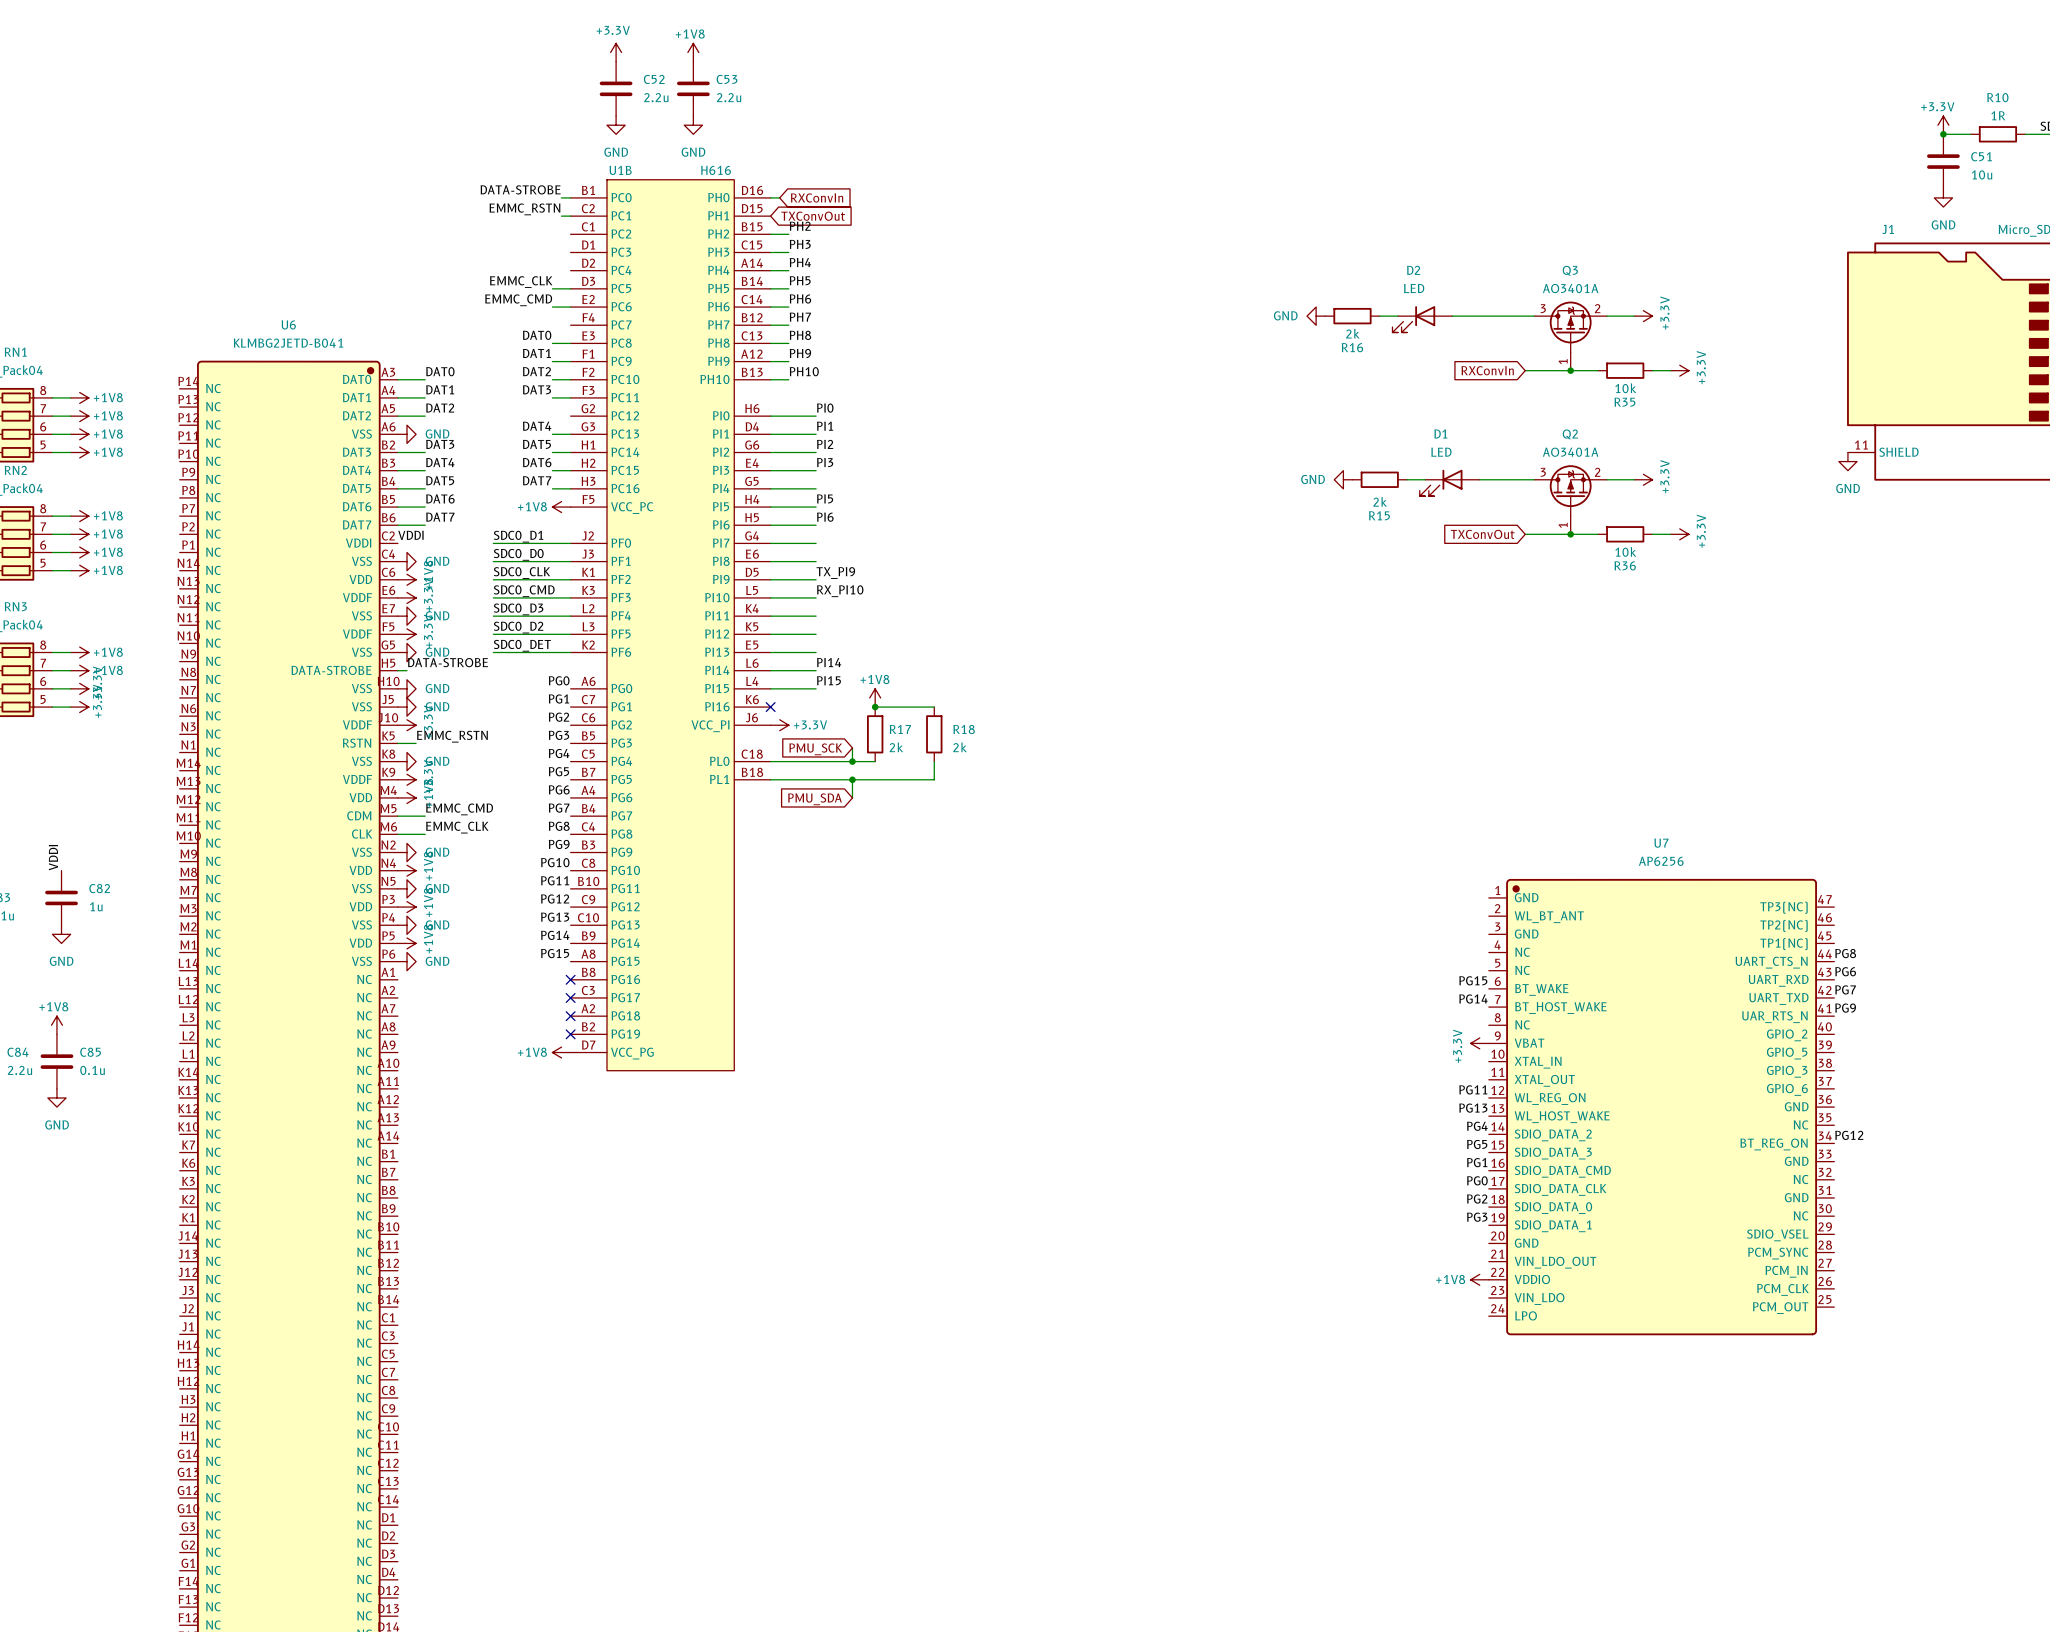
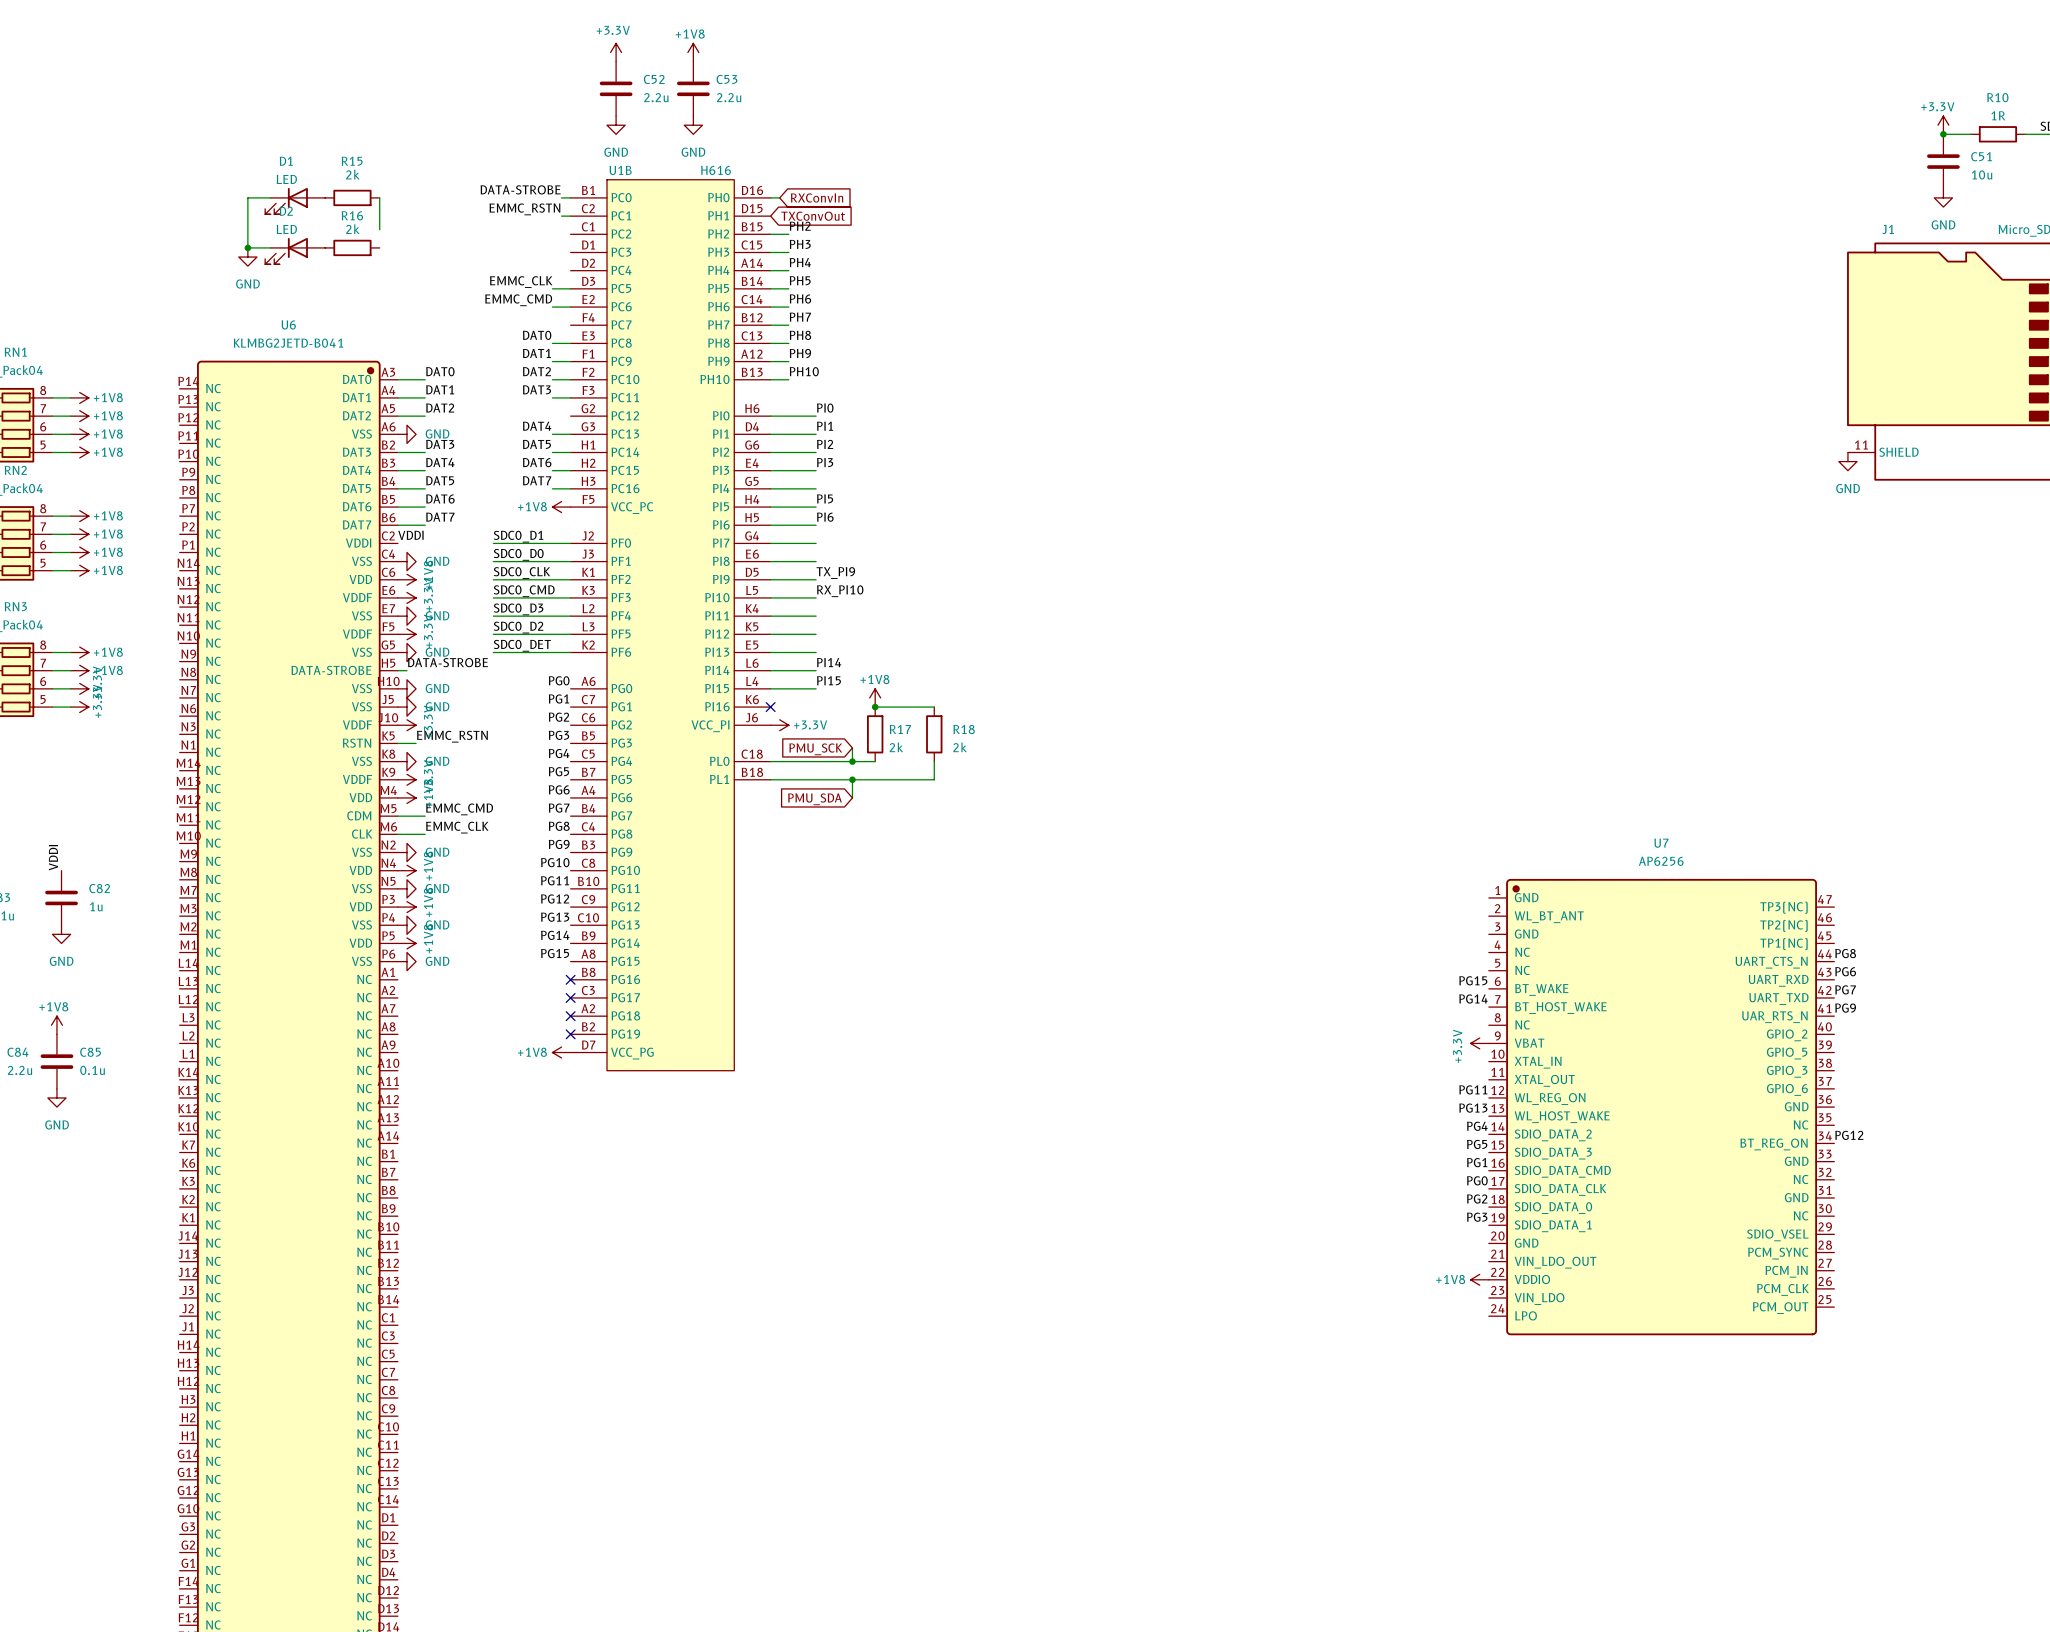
wire: none -> (270, 197) (247, 197) (247, 247) (270, 247)
wire: none -> (379, 197) (379, 229)
junction: none -> (247, 247)
power symbol: none -> GND (247, 257)
D2 name position: D2 (1413, 270) -> D2 (286, 211)
D2 value position: LED (1414, 288) -> LED (286, 229)
power symbol: GND (1316, 316) -> none
R16 position: (1352, 316) -> (352, 247)
wire: (1379, 316) (1397, 316) -> none
wire: (1452, 316) (1534, 316) -> none
wire: (1607, 316) (1634, 316) -> none
power symbol: +3.3V (1643, 316) -> none
D2 position: (1422, 319) -> (295, 251)
R16 value position: 2k (1352, 333) -> 2k (352, 229)
Q3: AO3401A (1570, 336) -> none
R16 name position: R16 (1352, 347) -> R16 (352, 215)
global label: RXConvIn (1487, 370) -> none
wire: (1525, 370) (1597, 370) -> none
junction: (1570, 370) -> none
R35: 10k (1625, 370) -> none
wire: (1652, 370) (1670, 370) -> none
power symbol: +3.3V (1679, 370) -> none
D1 name position: D1 (1440, 433) -> D1 (286, 161)
D1 value position: LED (1441, 452) -> LED (286, 179)
power symbol: GND (1343, 479) -> none
R15 position: (1379, 479) -> (352, 197)
wire: (1407, 479) (1425, 479) -> none
wire: (1479, 479) (1534, 479) -> none
wire: (1607, 479) (1634, 479) -> none
power symbol: +3.3V (1643, 479) -> none
D1 position: (1449, 482) -> (295, 201)
Q2: AO3401A (1570, 499) -> none
R15 value position: 2k (1380, 501) -> 2k (352, 174)
R15 name position: R15 (1379, 515) -> R15 (352, 161)
global label: TXConvOut (1482, 534) -> none
wire: (1525, 534) (1597, 534) -> none
junction: (1570, 534) -> none
R36: 10k (1625, 534) -> none
wire: (1652, 534) (1670, 534) -> none
power symbol: +3.3V (1679, 534) -> none

